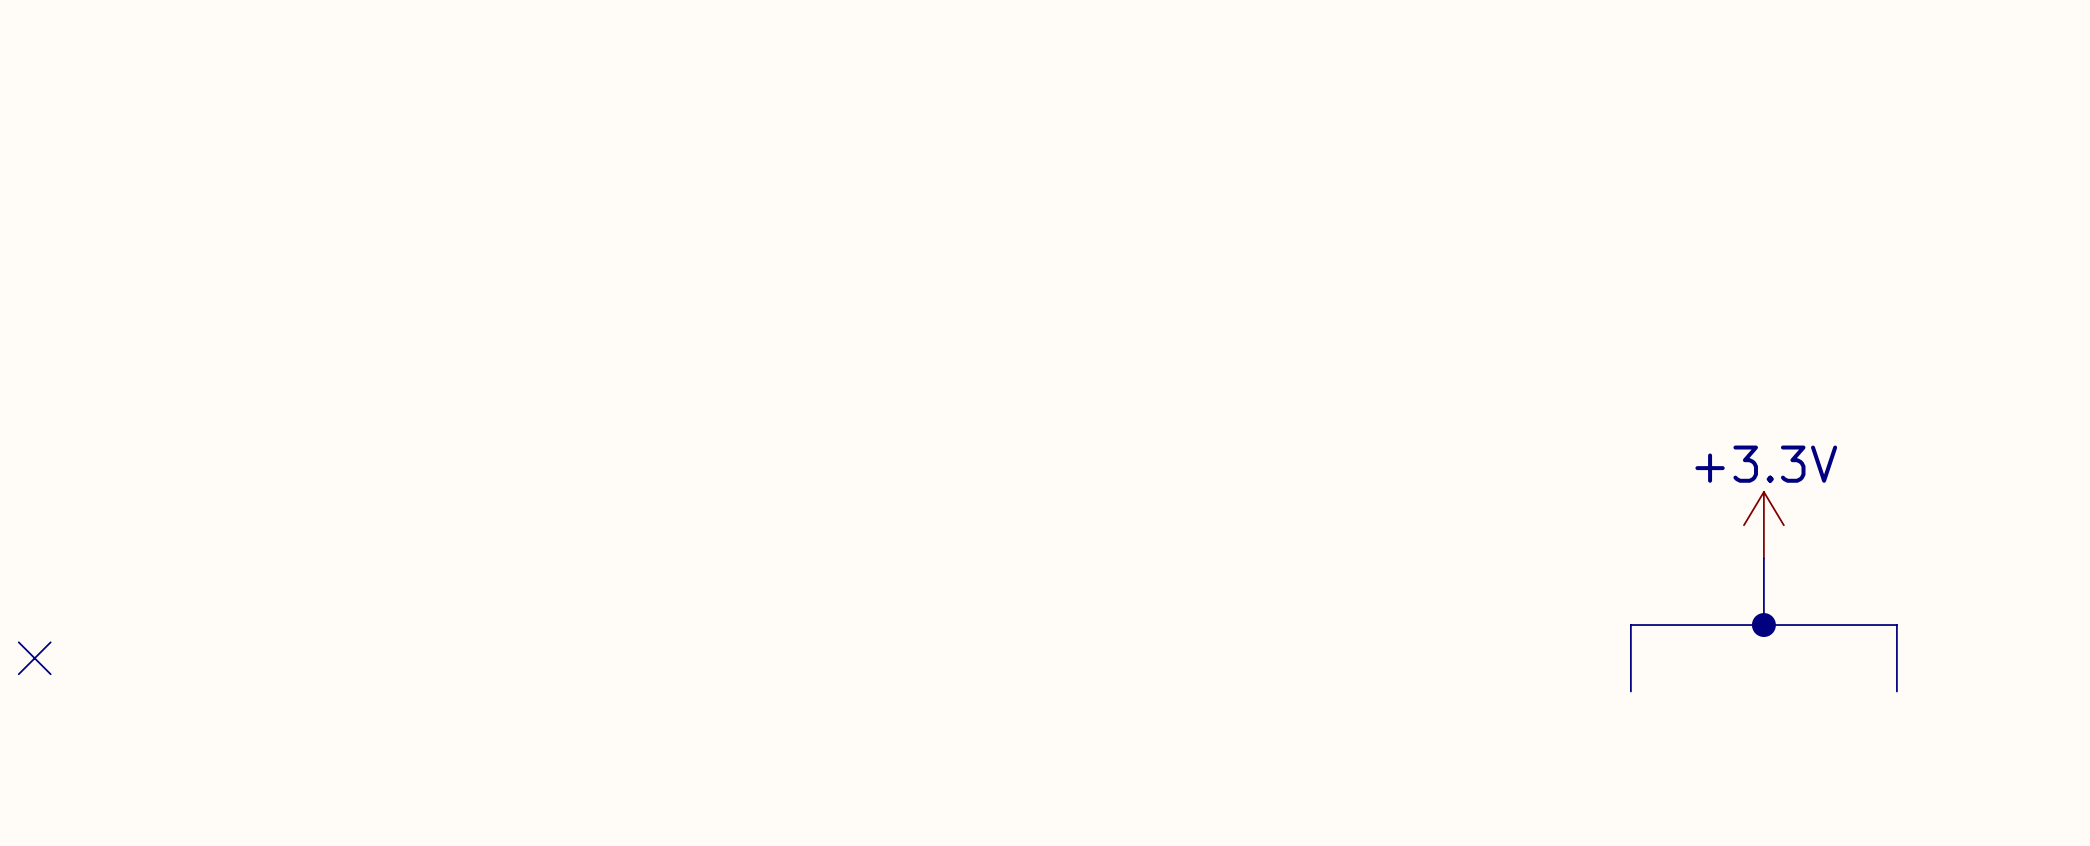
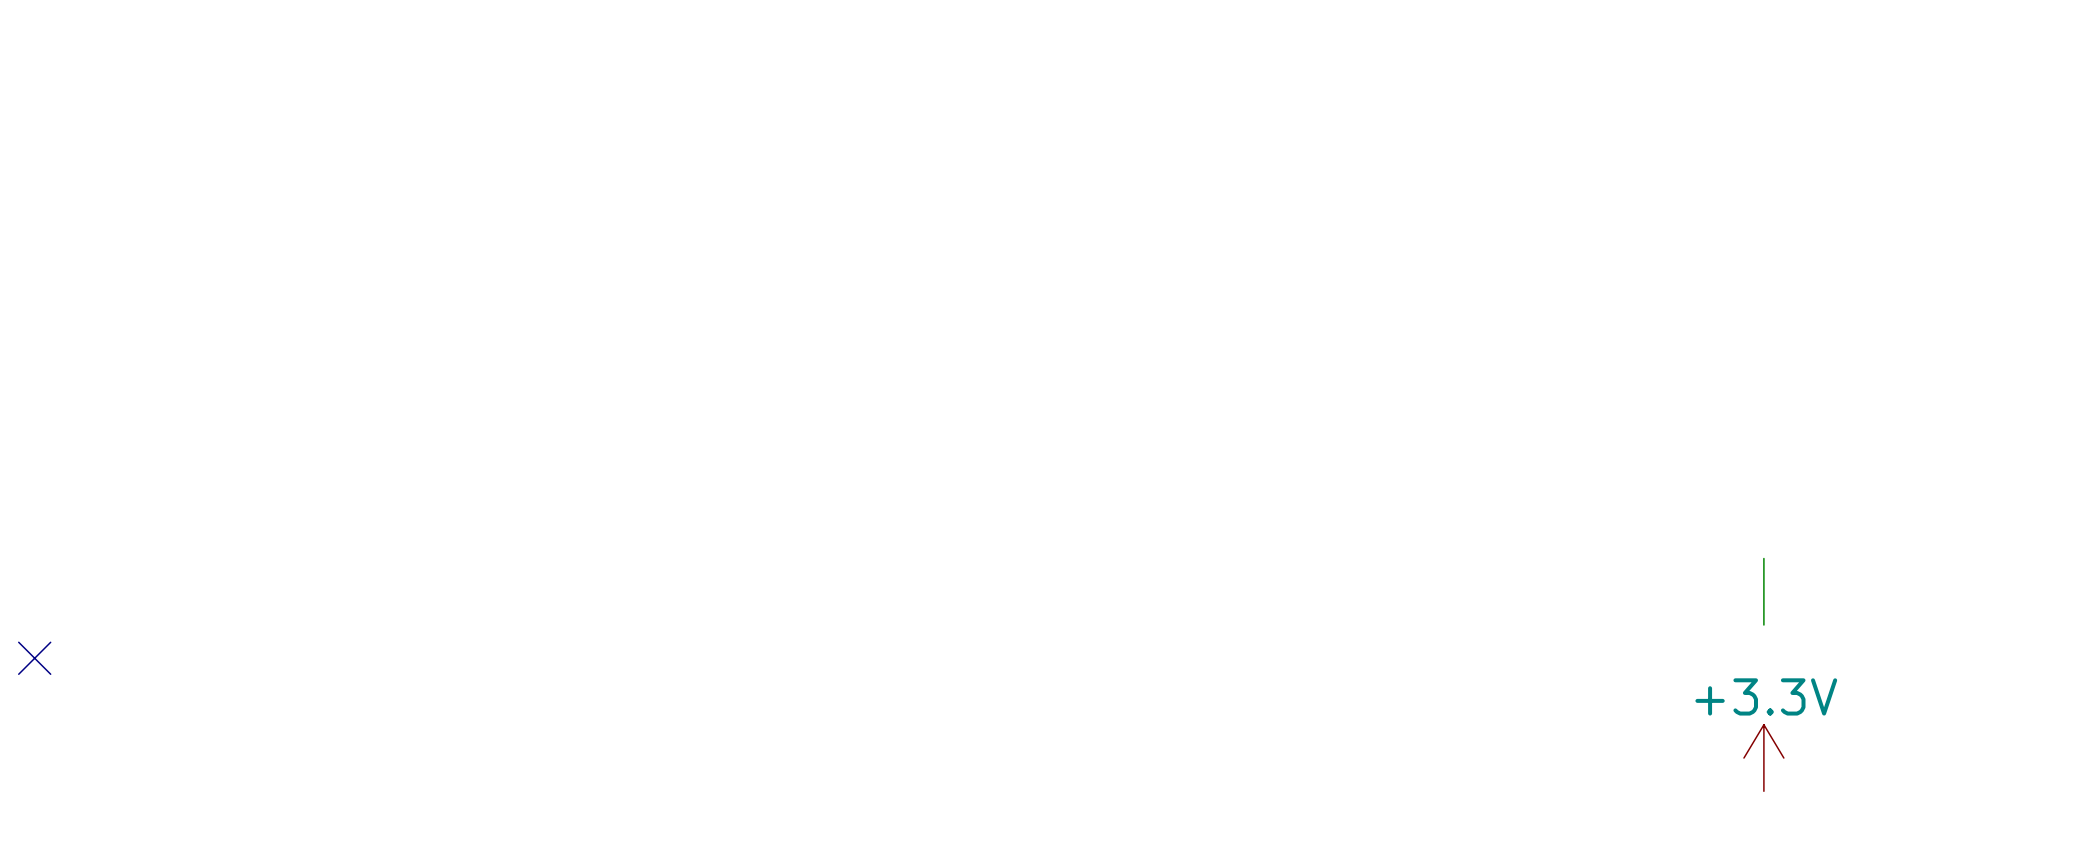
power symbol position: +3.3V (1763, 525) -> +3.3V (1763, 758)
junction: (1763, 625) -> none
wire: (1630, 691) (1630, 625) (1896, 625) (1896, 691) -> none

